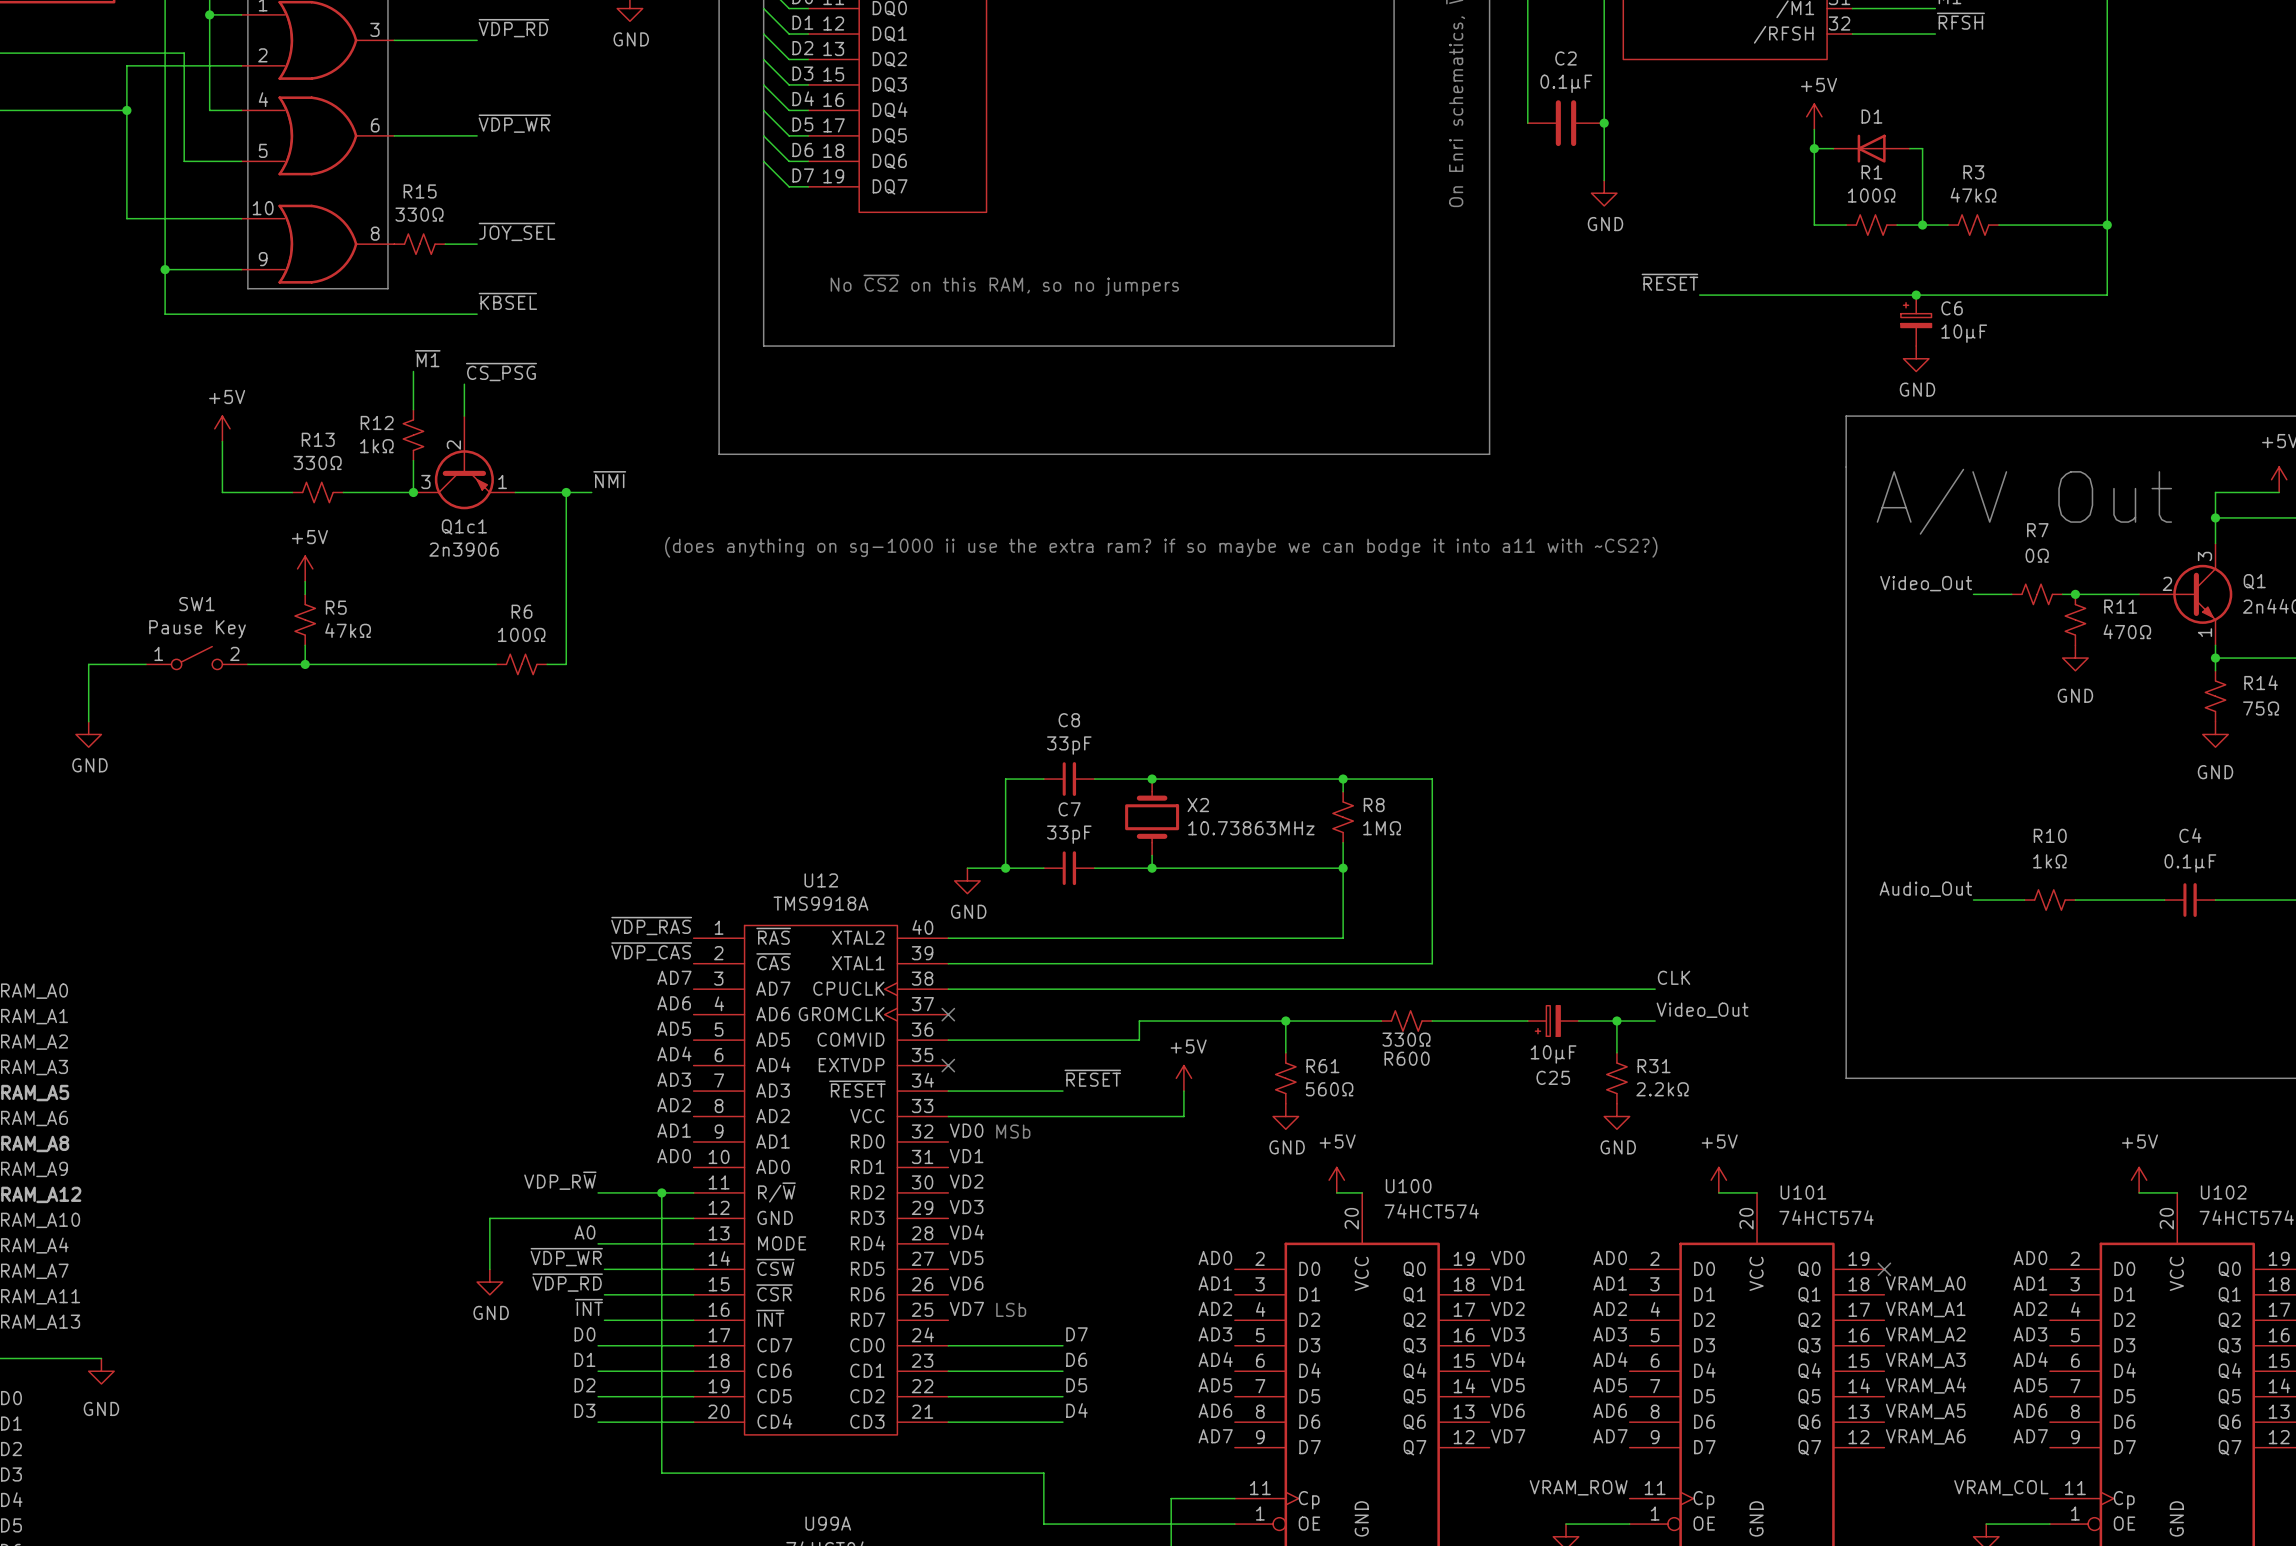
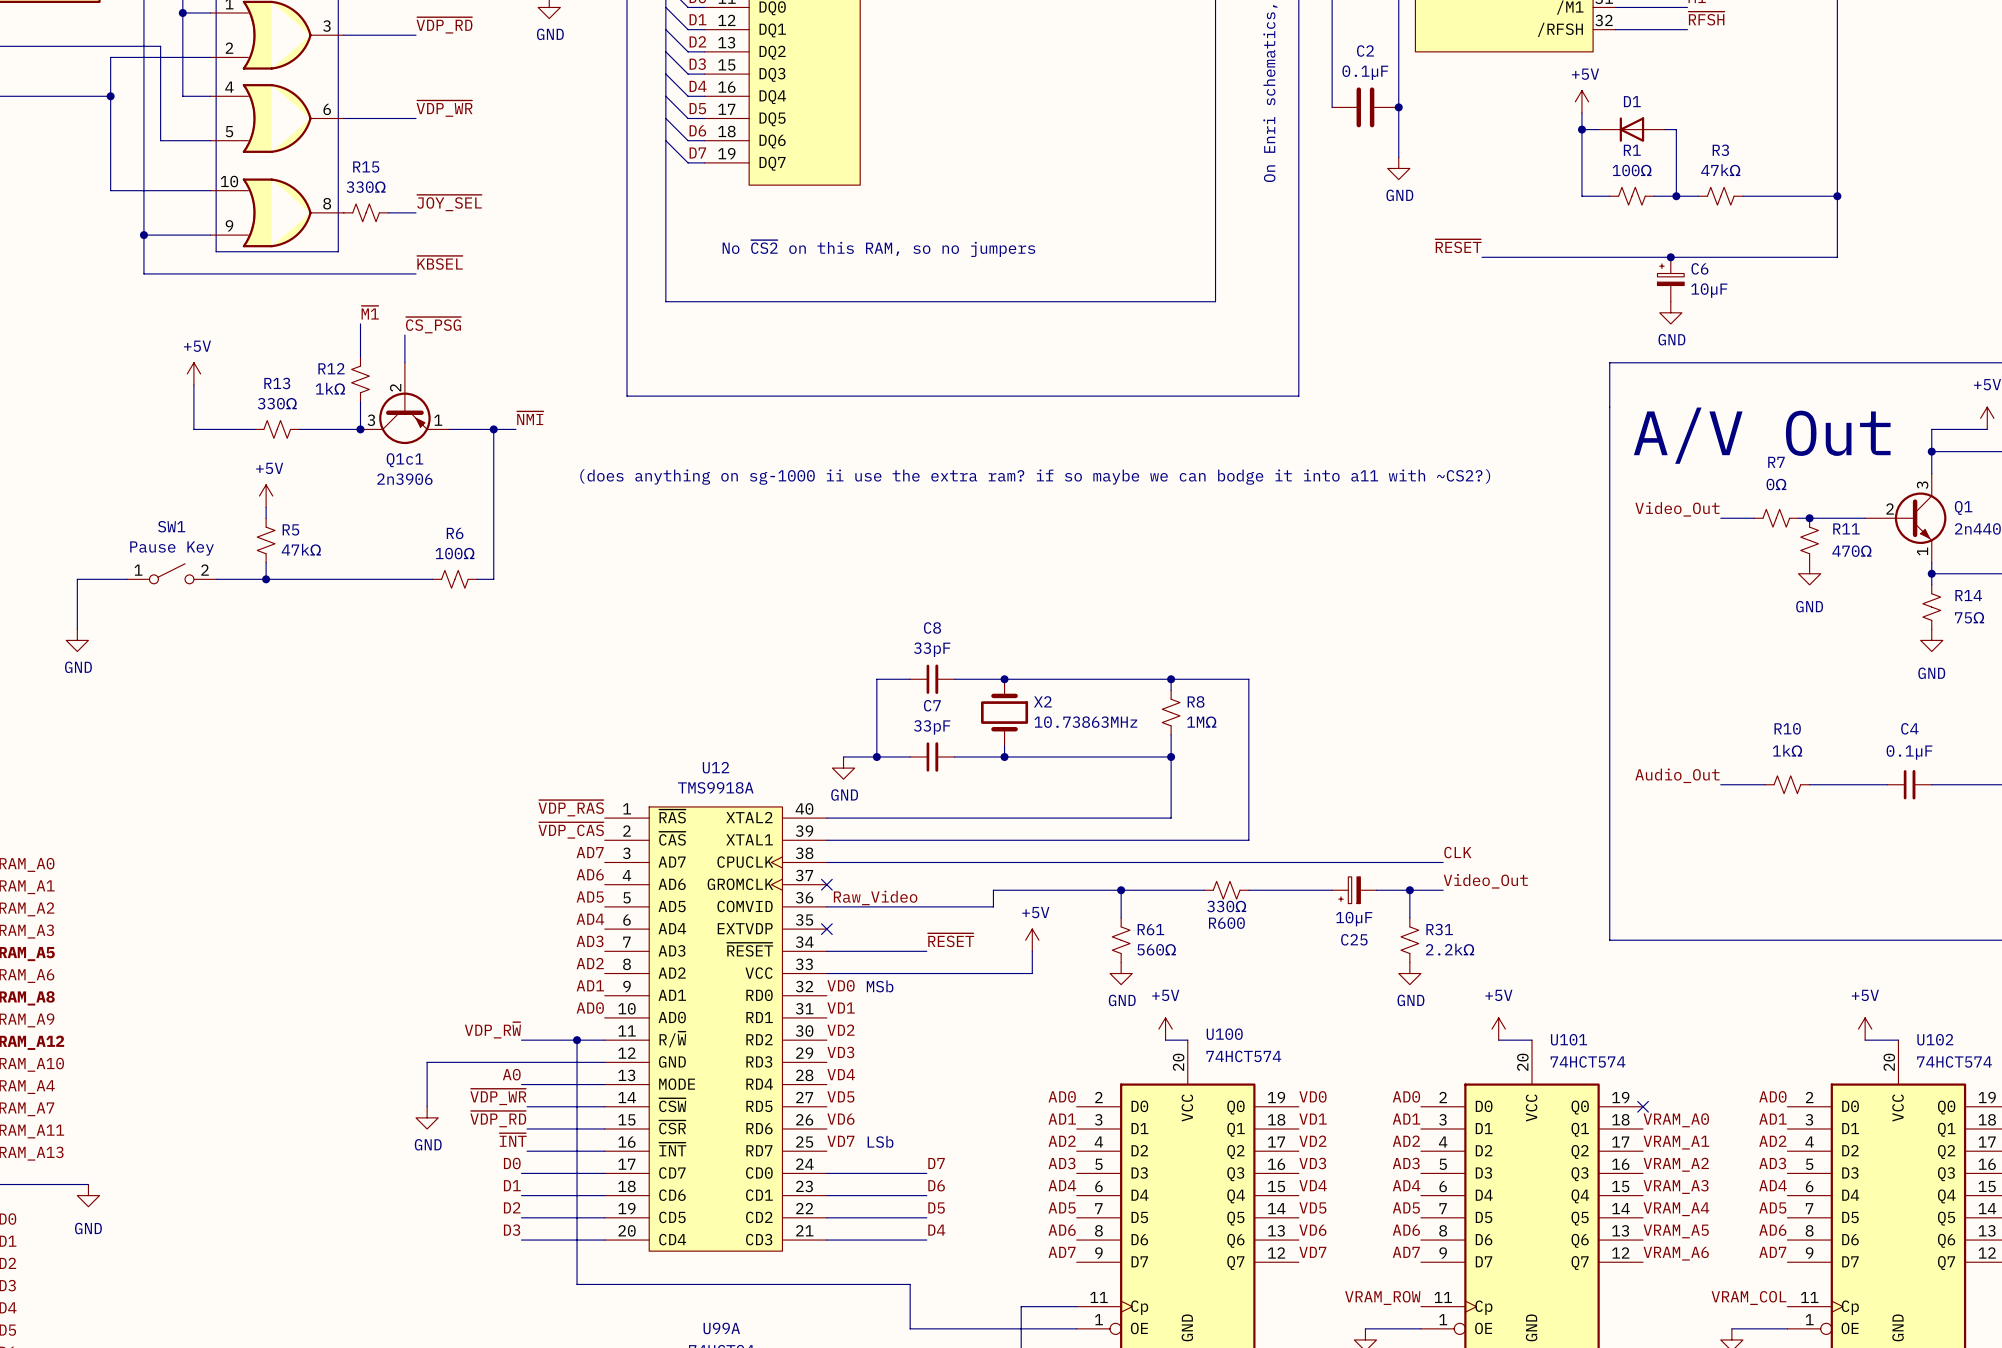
label: none -> Raw_Video (875, 897)

